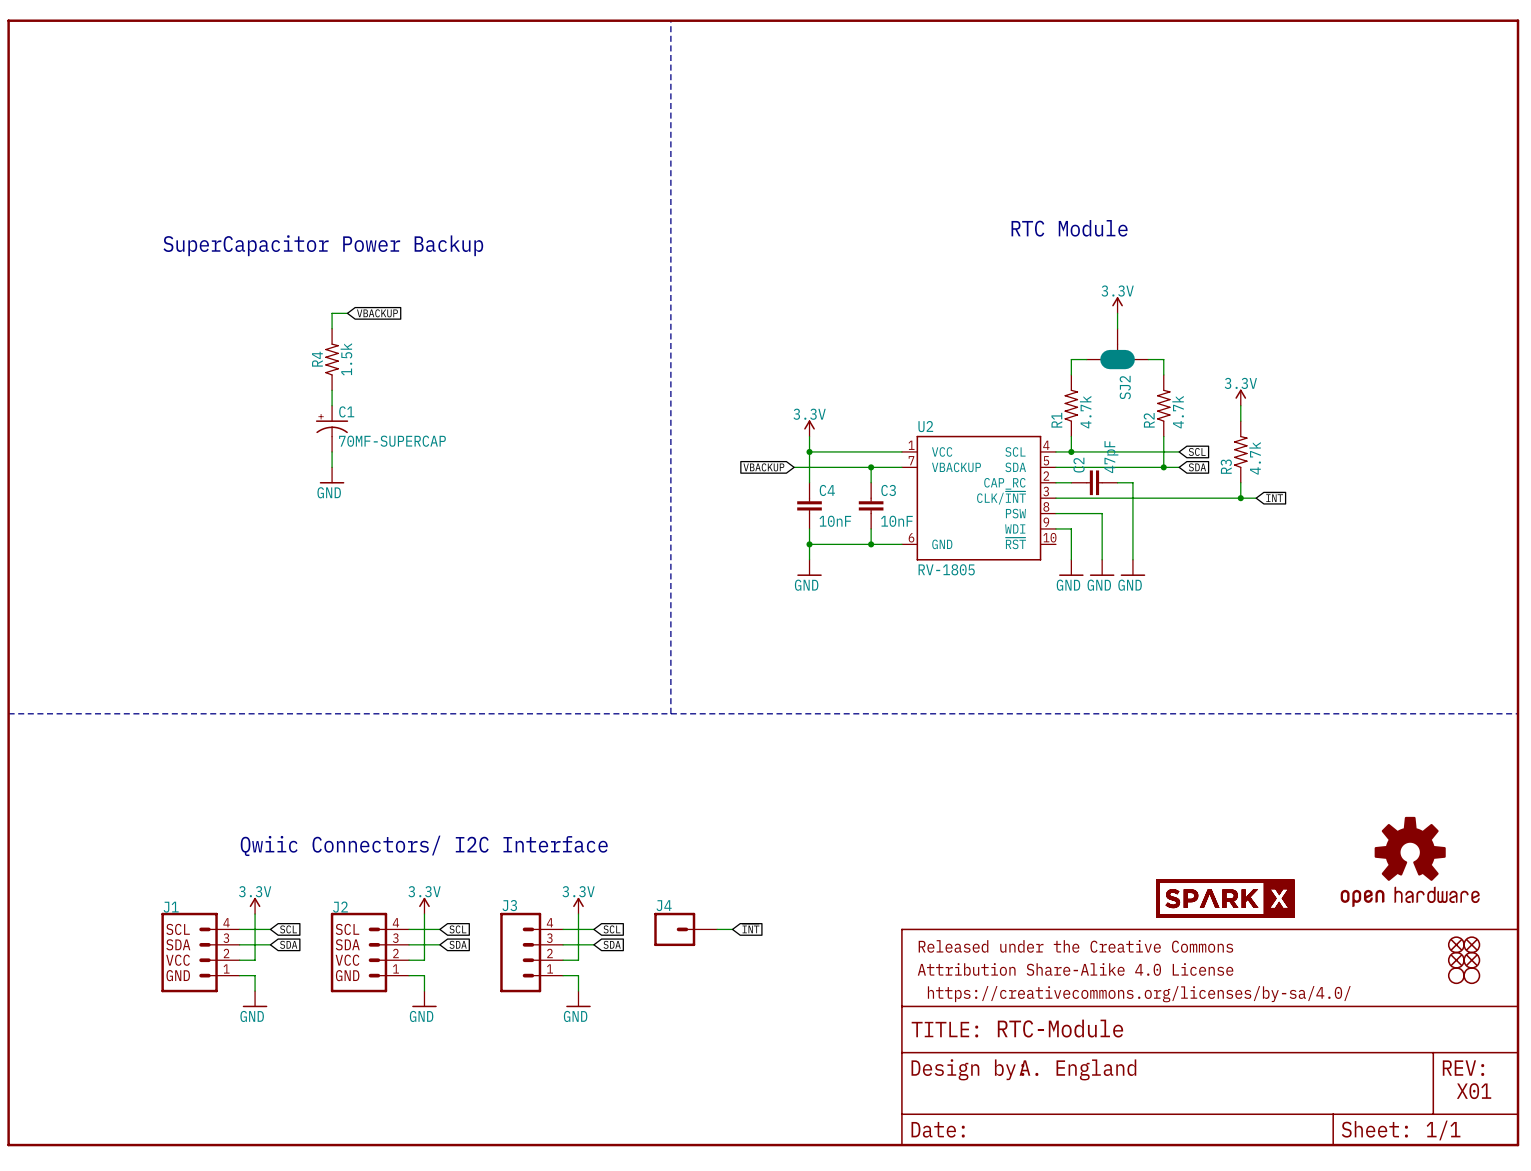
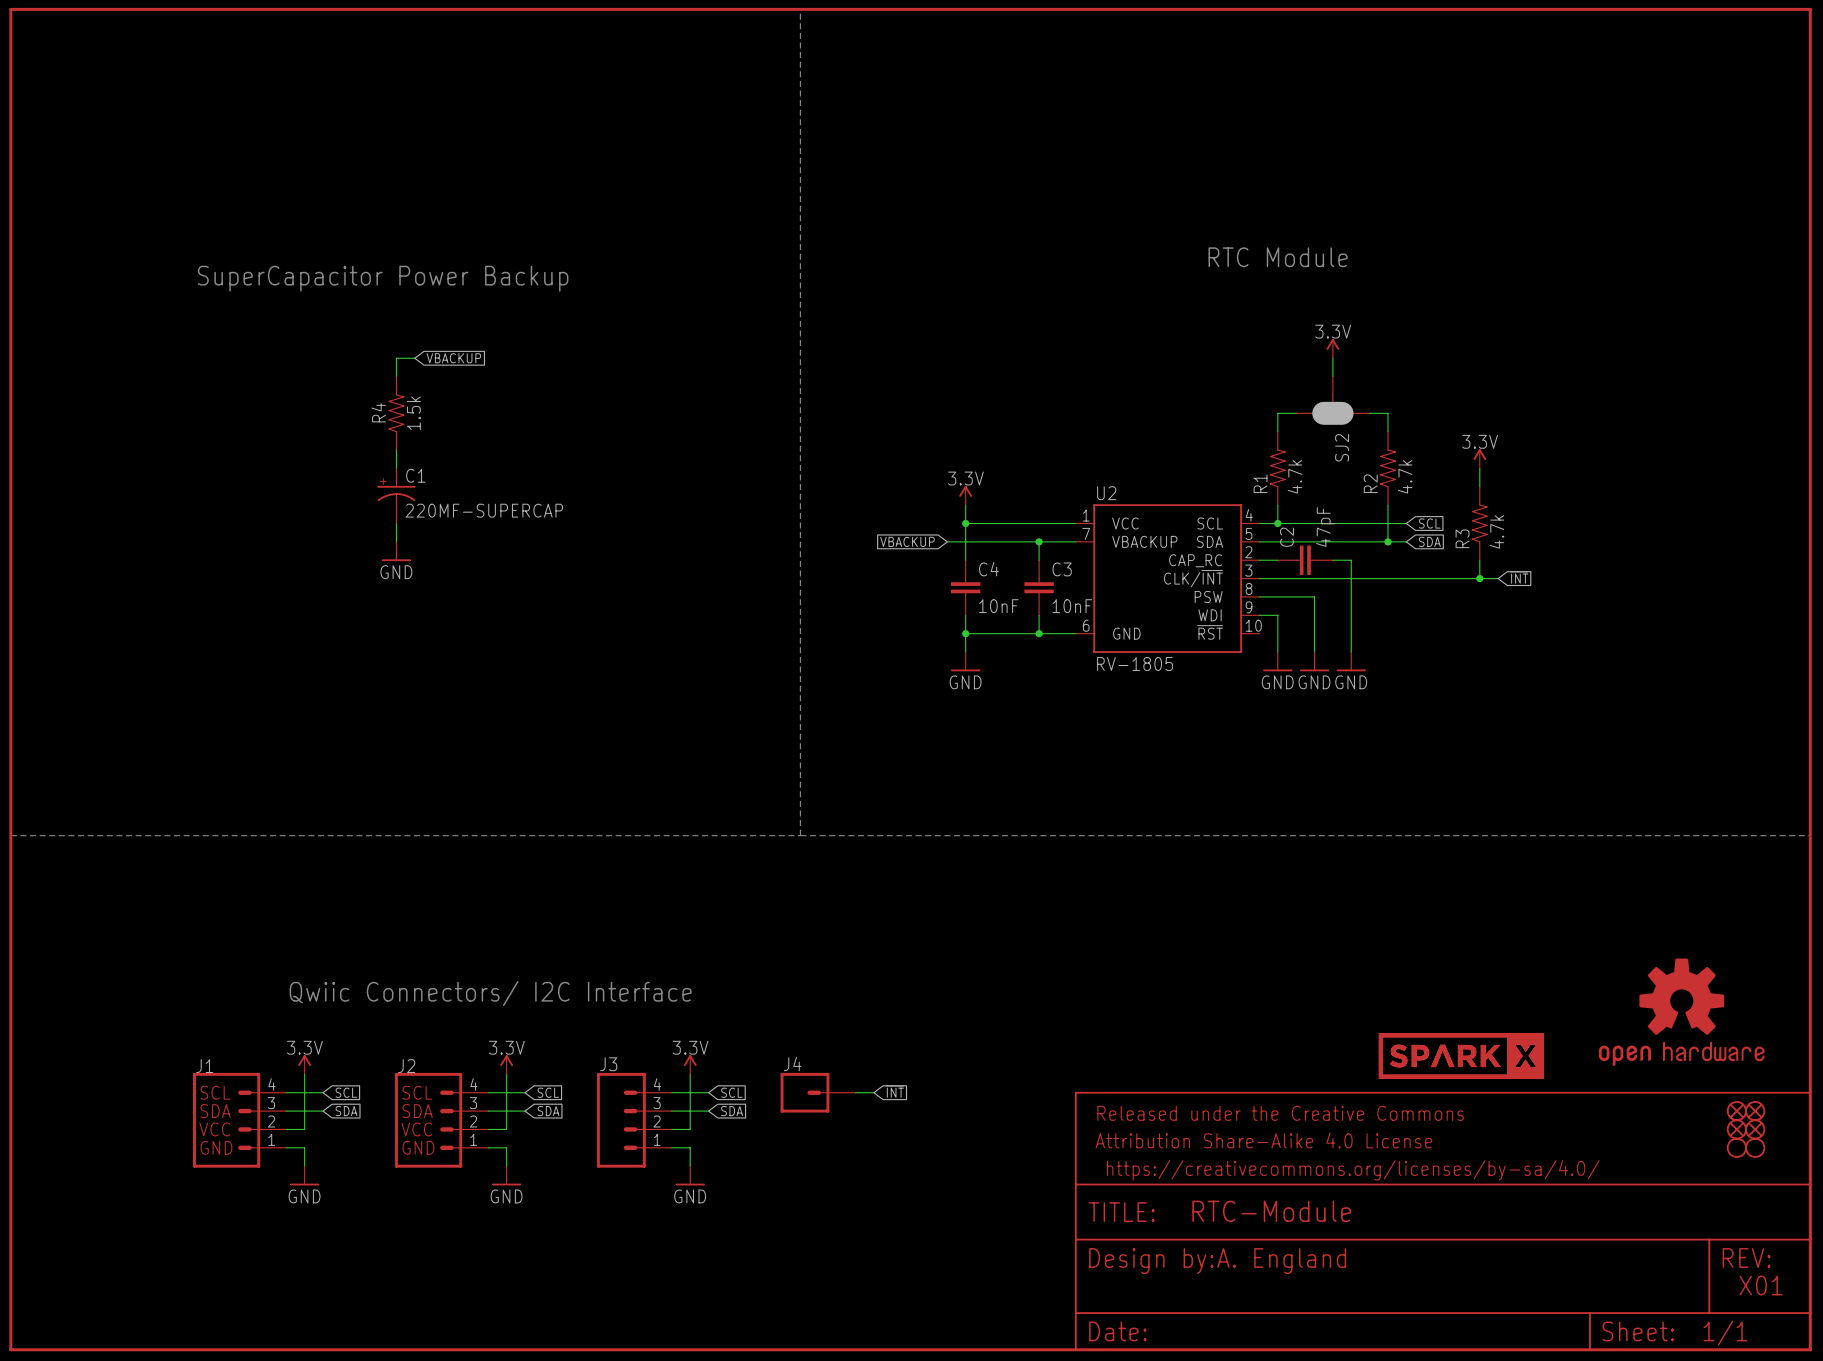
C1 value: 70MF-SUPERCAP (392, 441) -> 220MF-SUPERCAP (484, 510)

